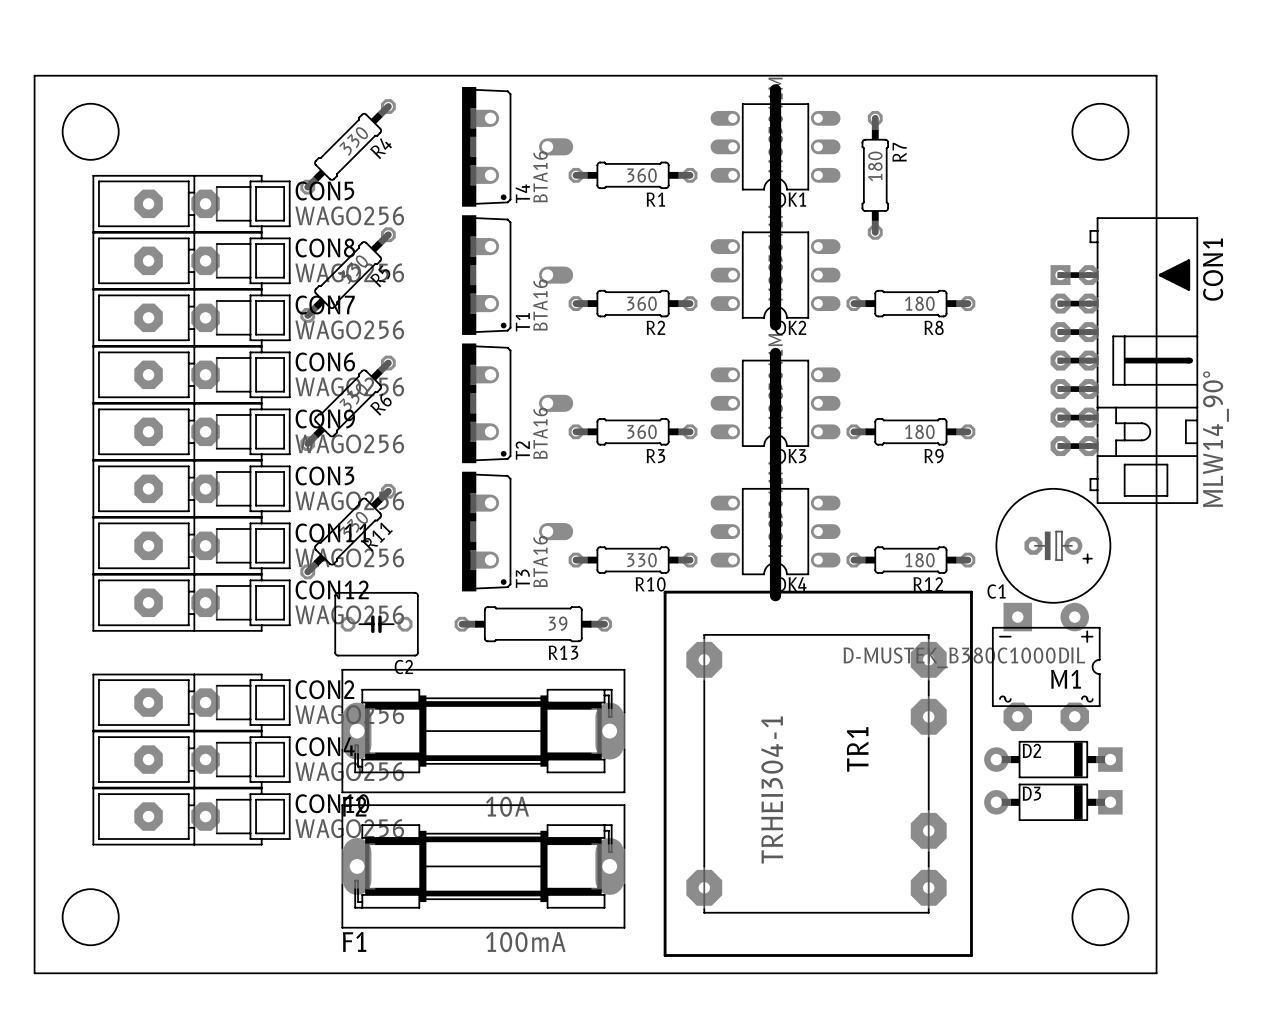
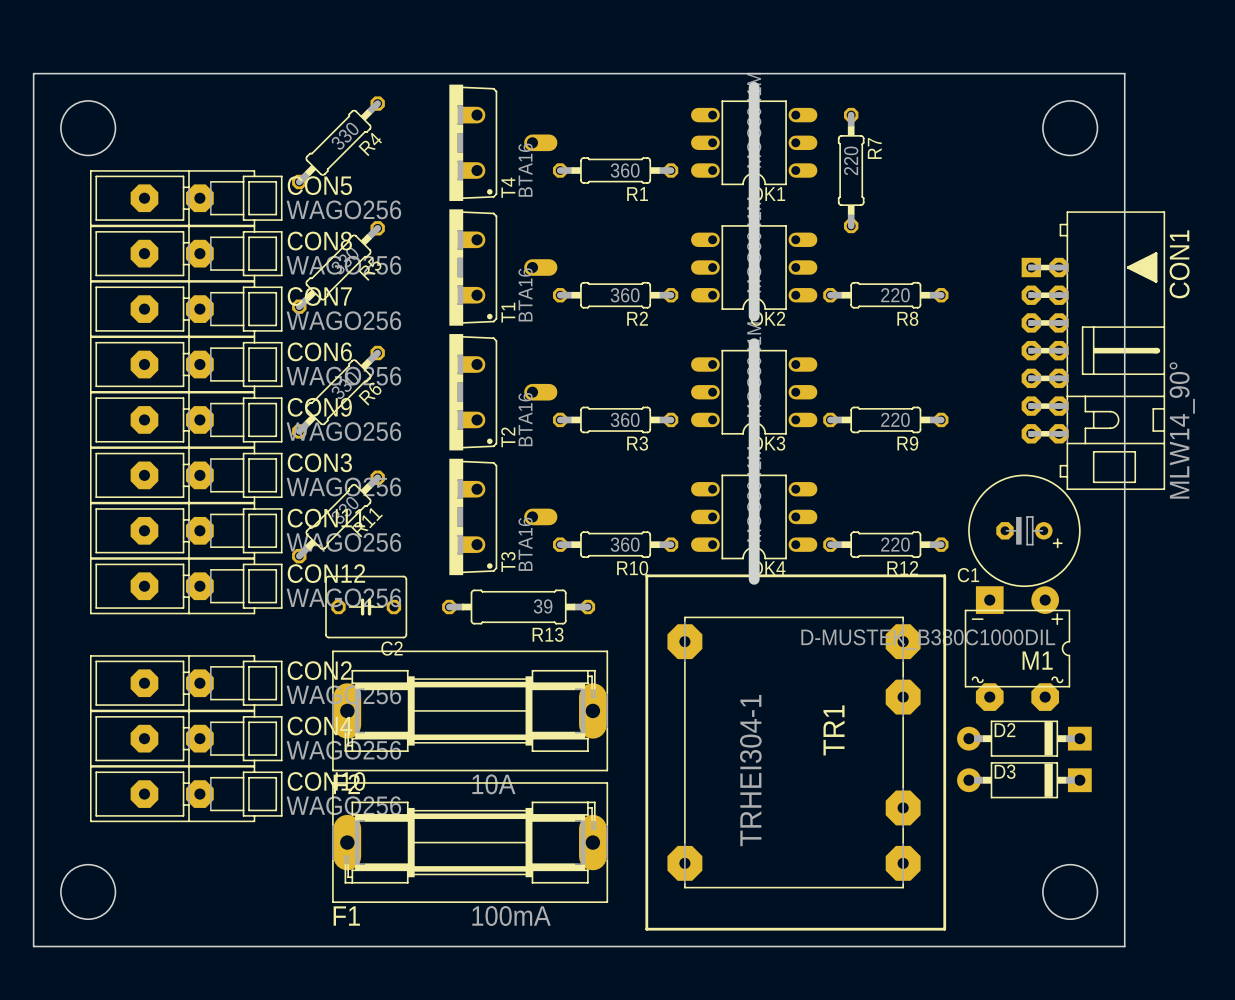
R7 value: 180 (875, 166) -> 220 (851, 160)
R8 value: 180 (919, 303) -> 220 (895, 295)
R9 value: 180 (919, 431) -> 220 (895, 419)
R10 value: 330 (641, 560) -> 360 (625, 544)
R12 value: 180 (919, 560) -> 220 (895, 544)

